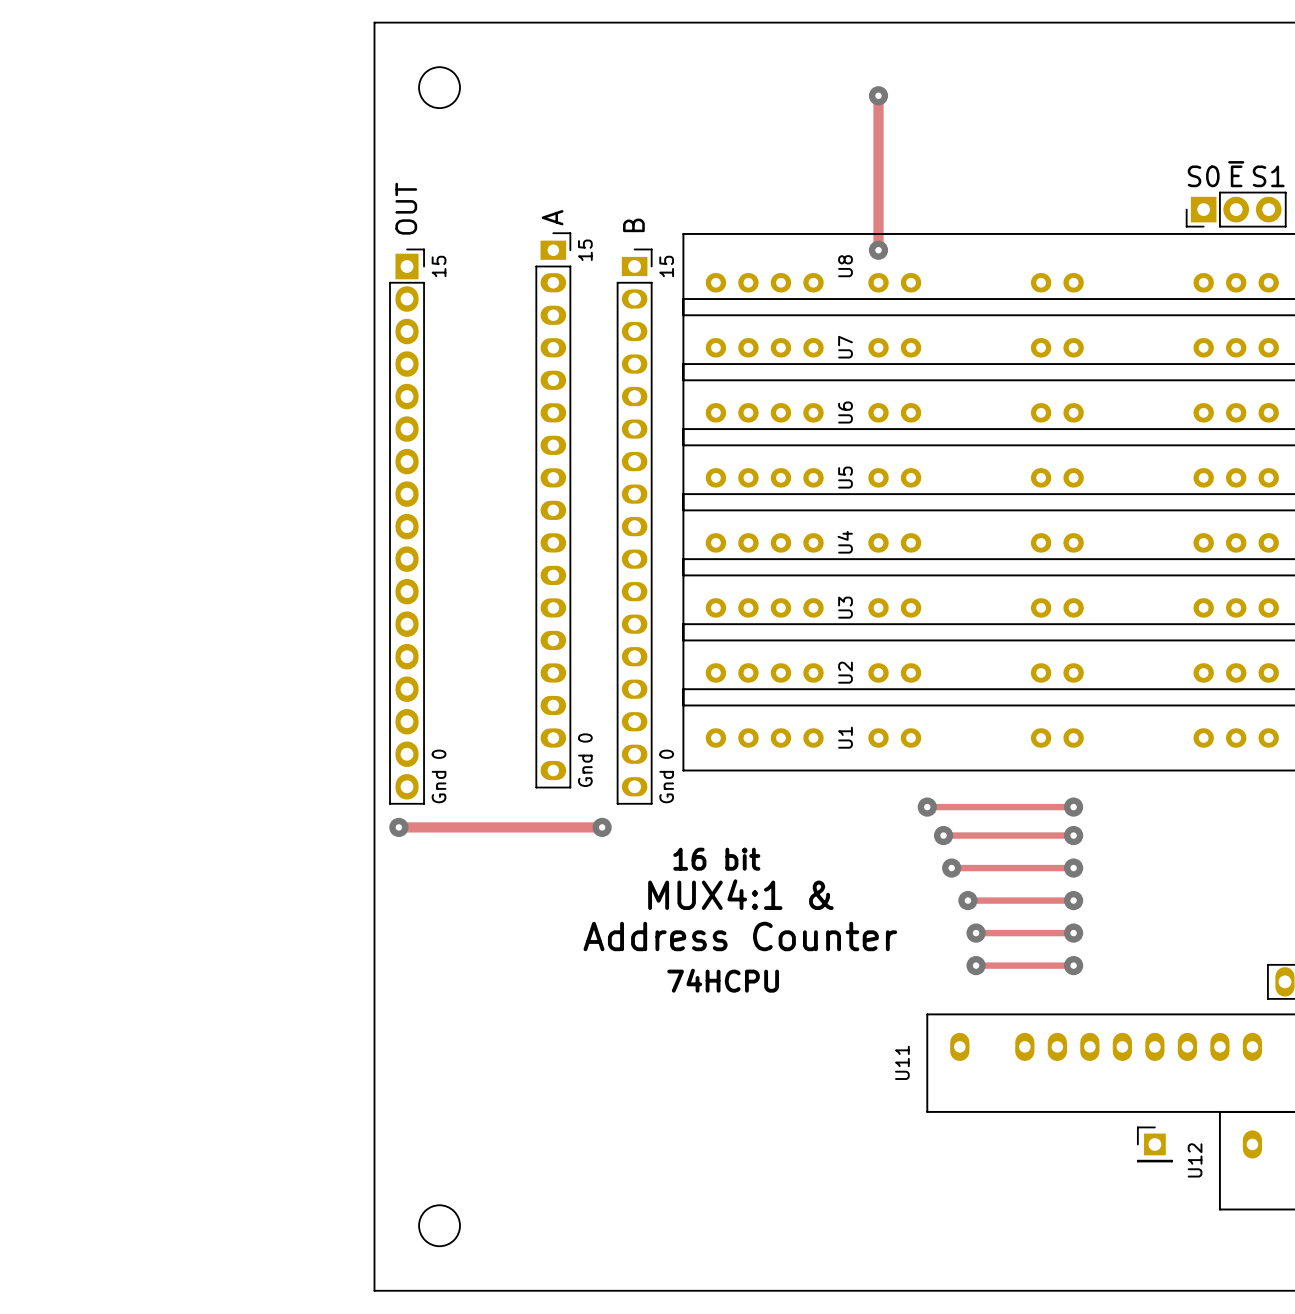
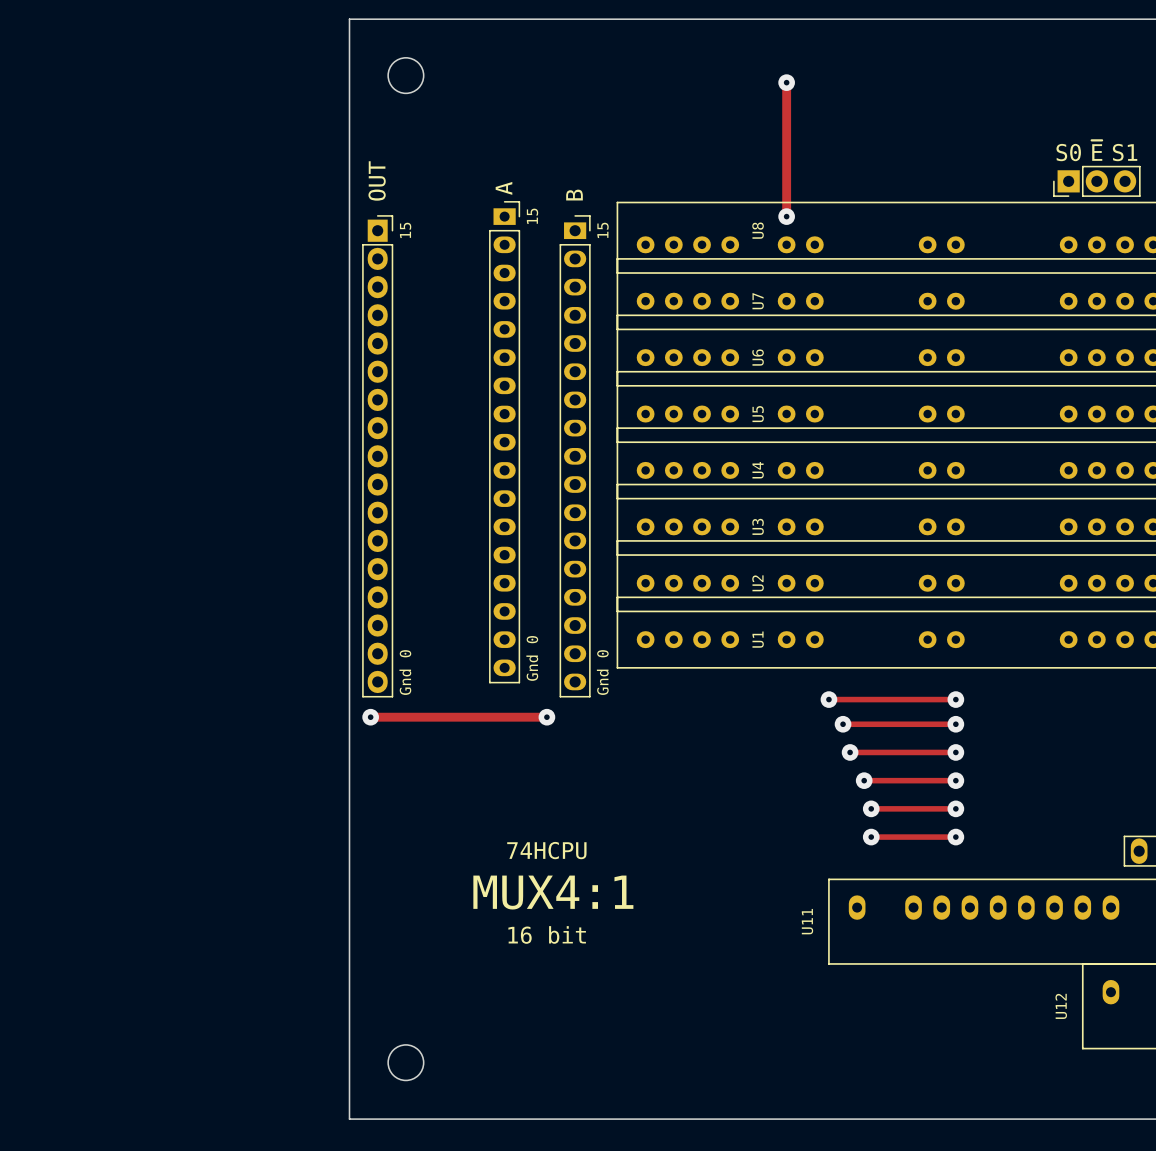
text position: 16 bit (716, 859) -> 16 bit (547, 934)
text: MUX4:1 & (740, 894) -> none
text: Address Counter (740, 936) -> none
text position: 74HCPU (723, 980) -> 74HCPU (546, 850)
text: none -> MUX4:1 (553, 892)
part: (1154, 1144) -> none

